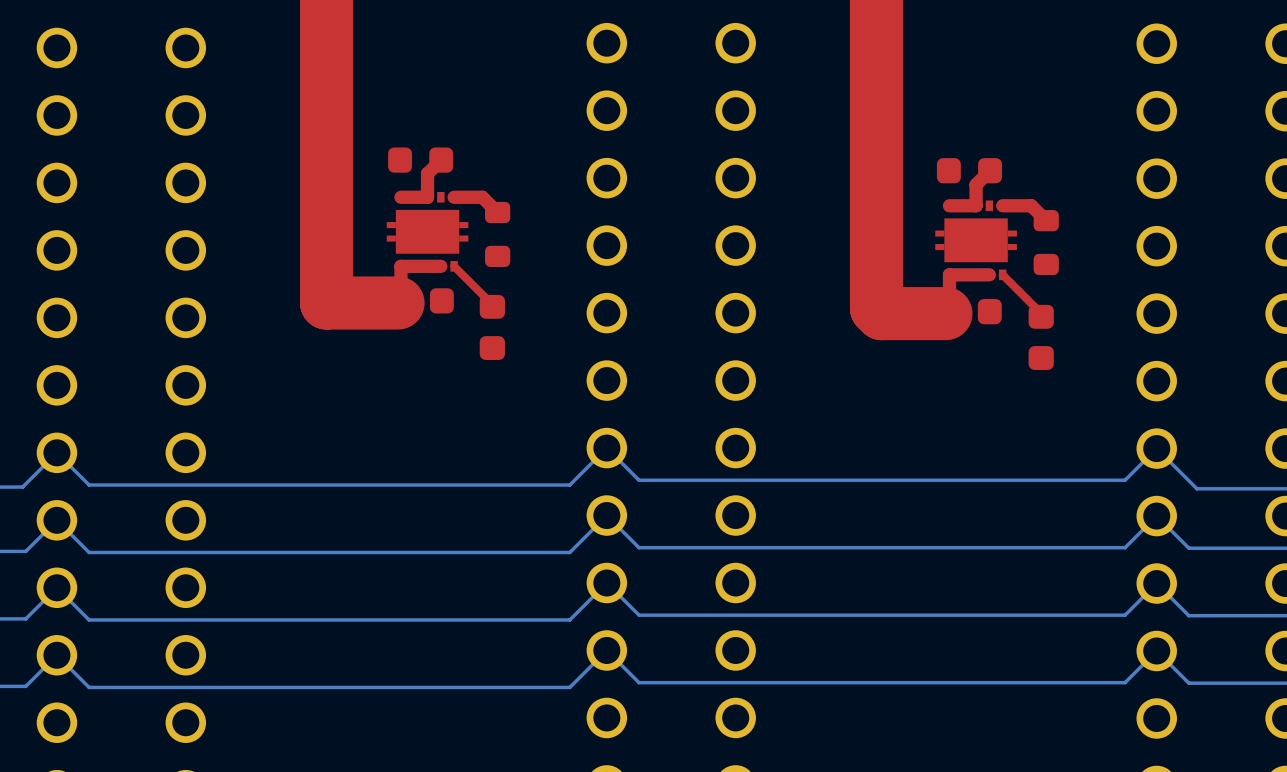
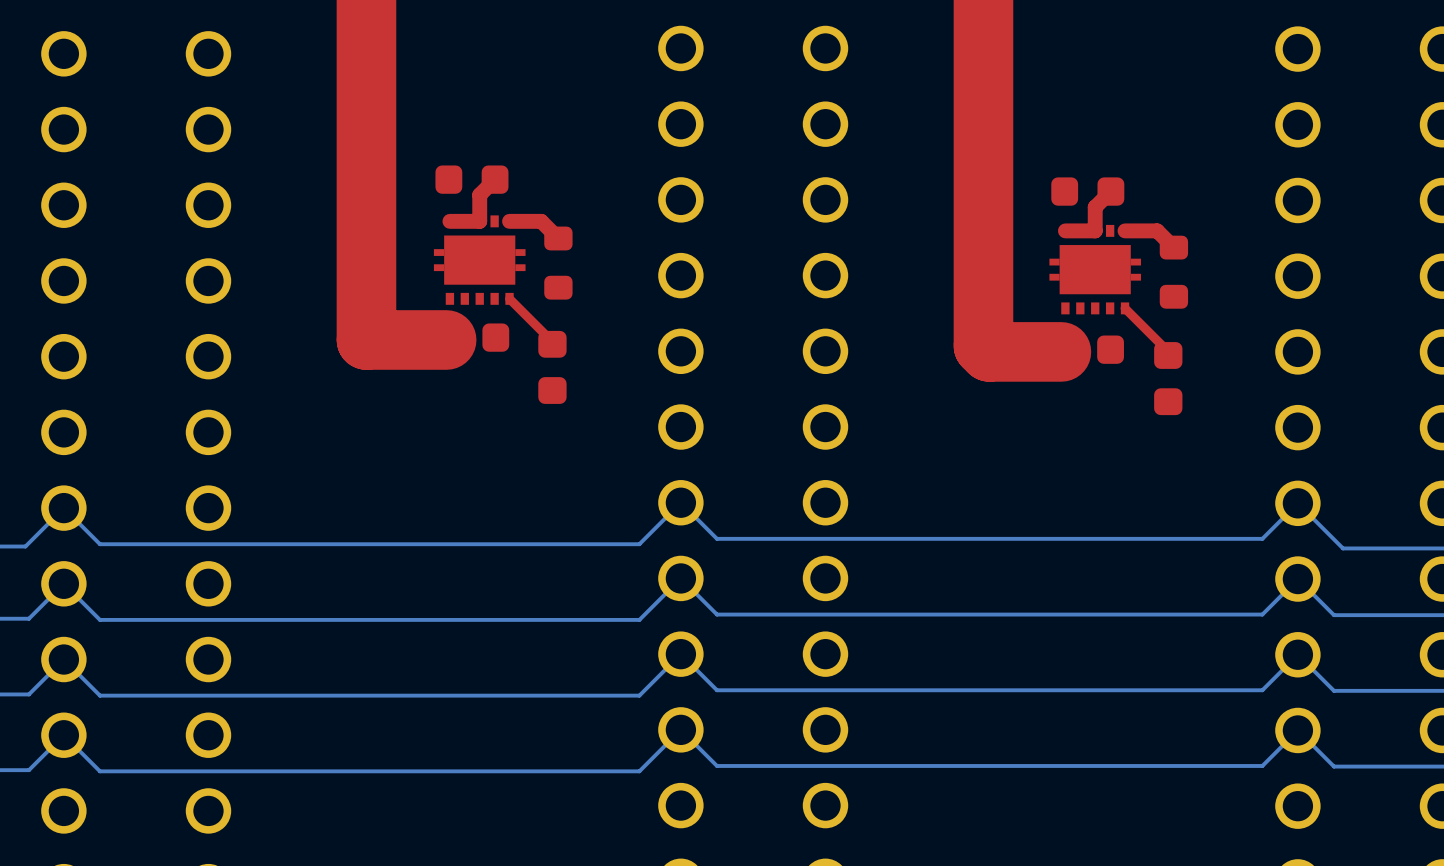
top track: (440, 266) (400, 266) (400, 300) -> none
top track: (989, 274) (949, 274) (948, 311) -> none

